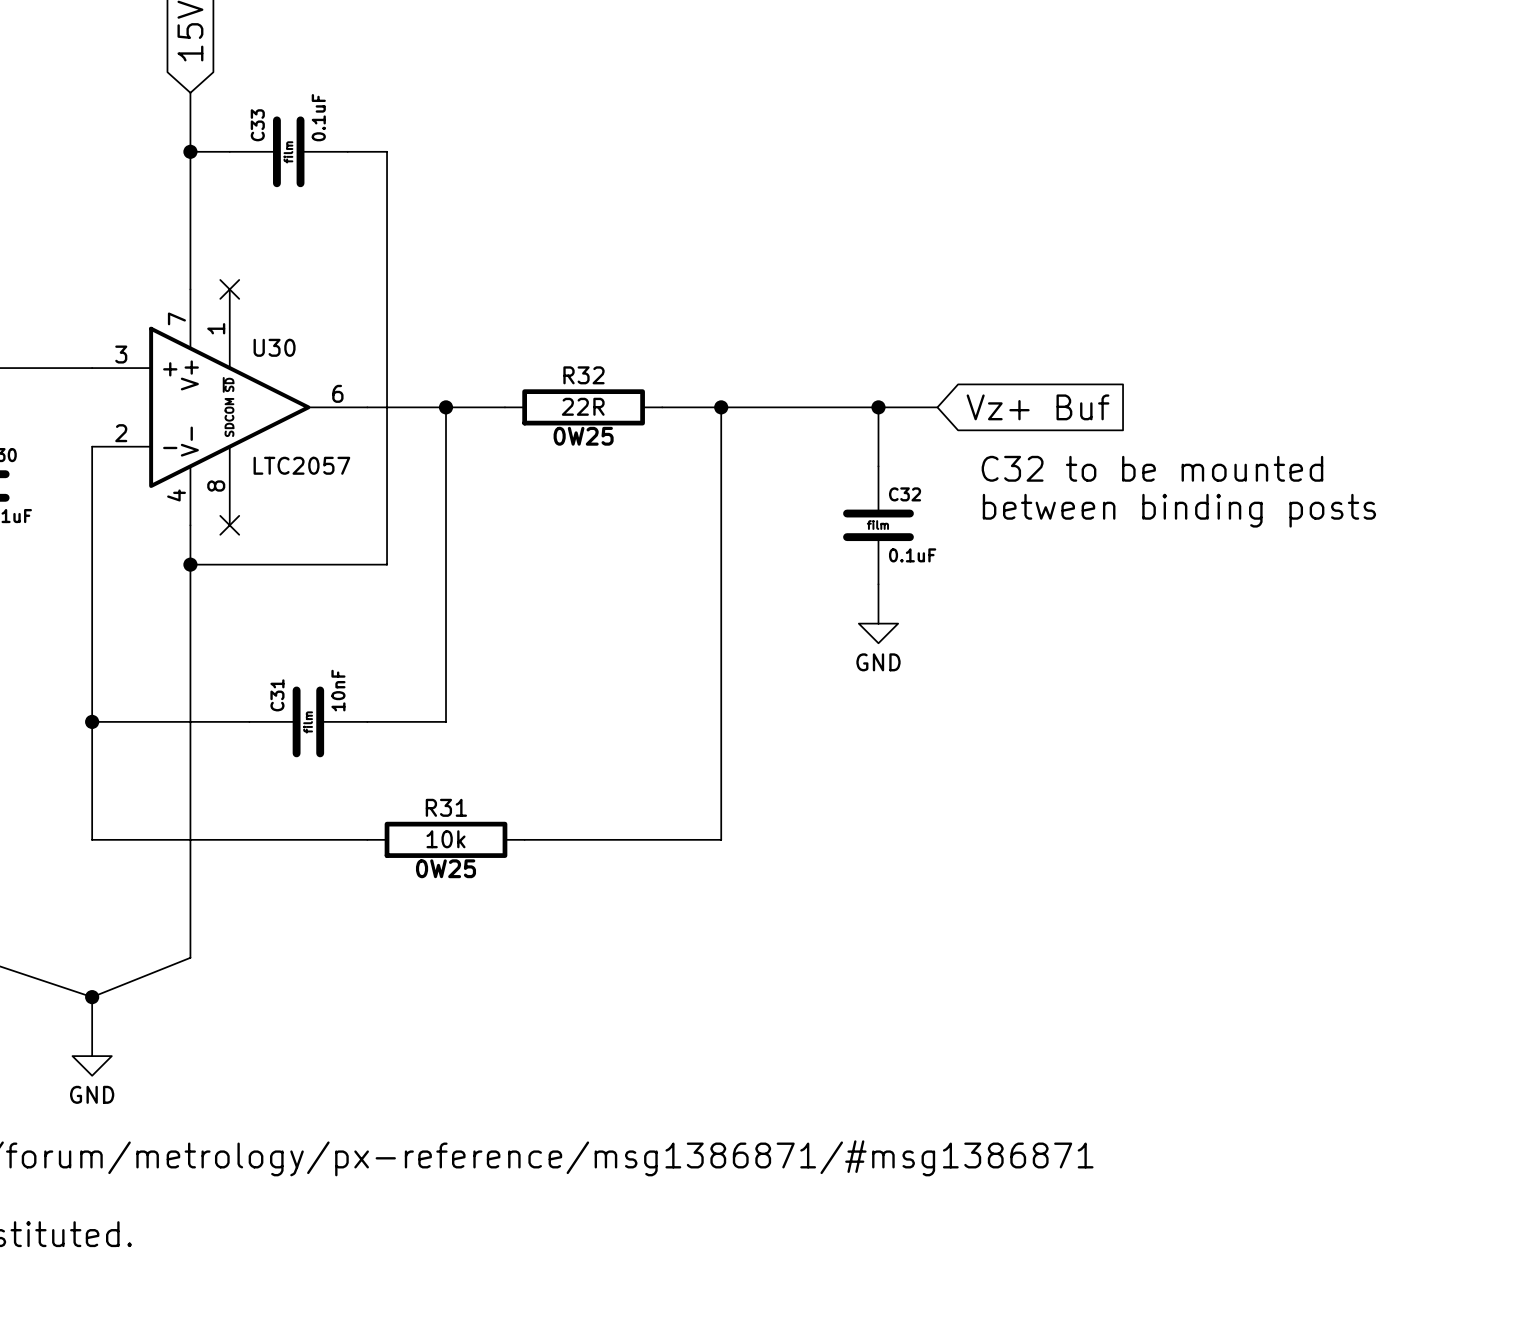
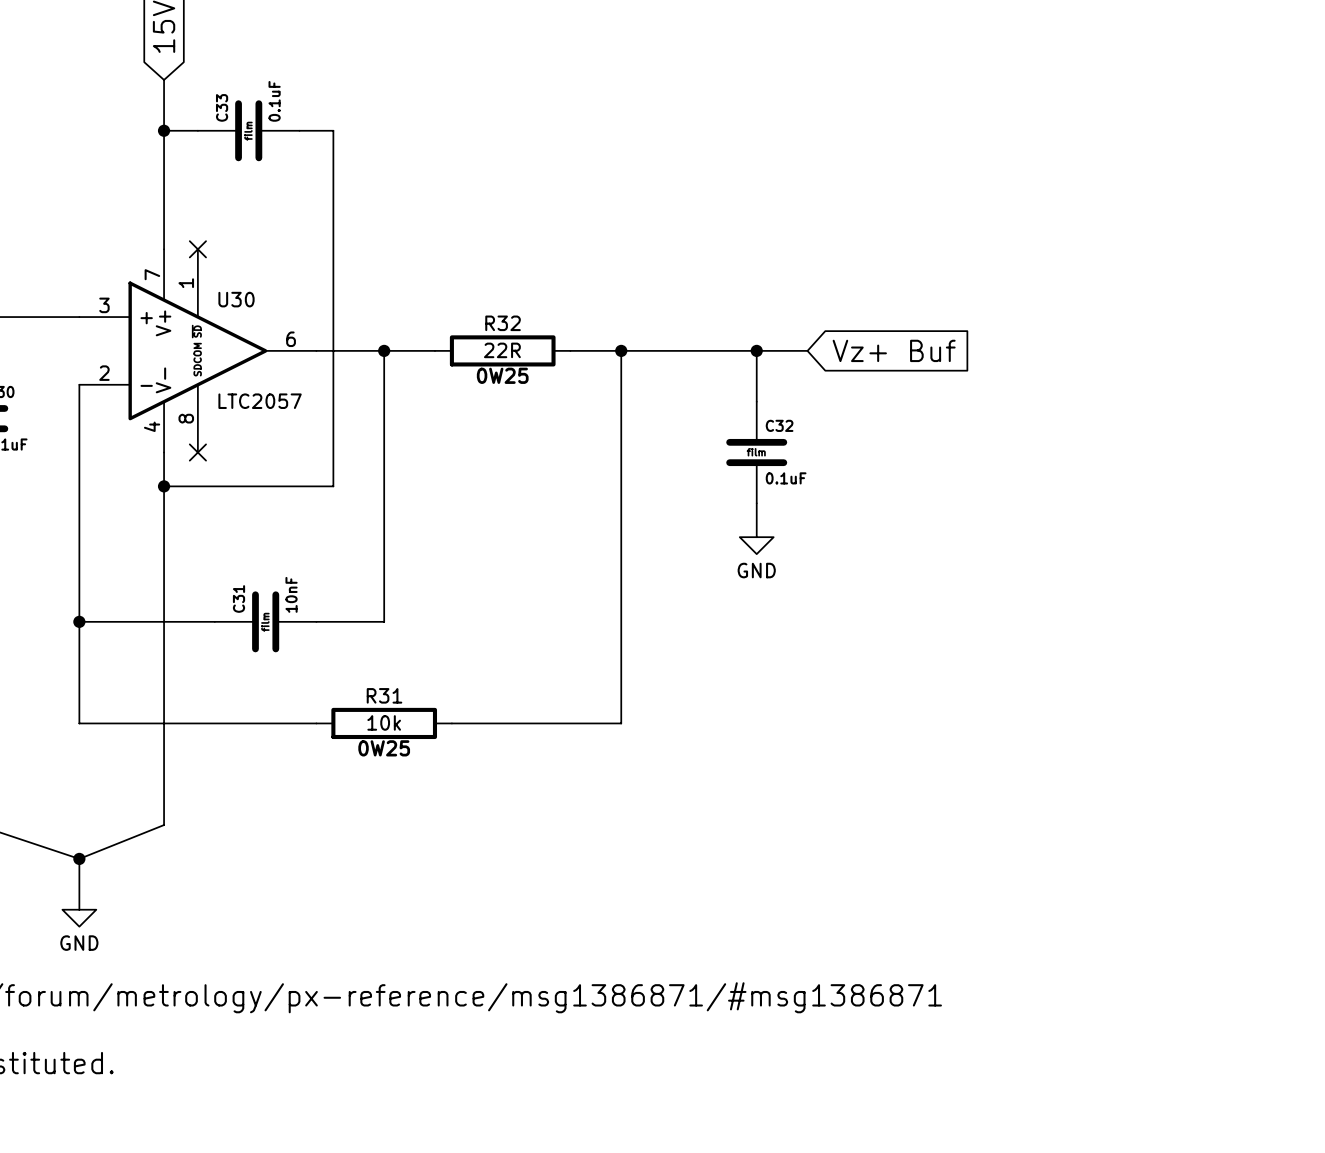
text: C32 to be mounted (1152, 468) -> none
text: between binding posts (1179, 510) -> none

